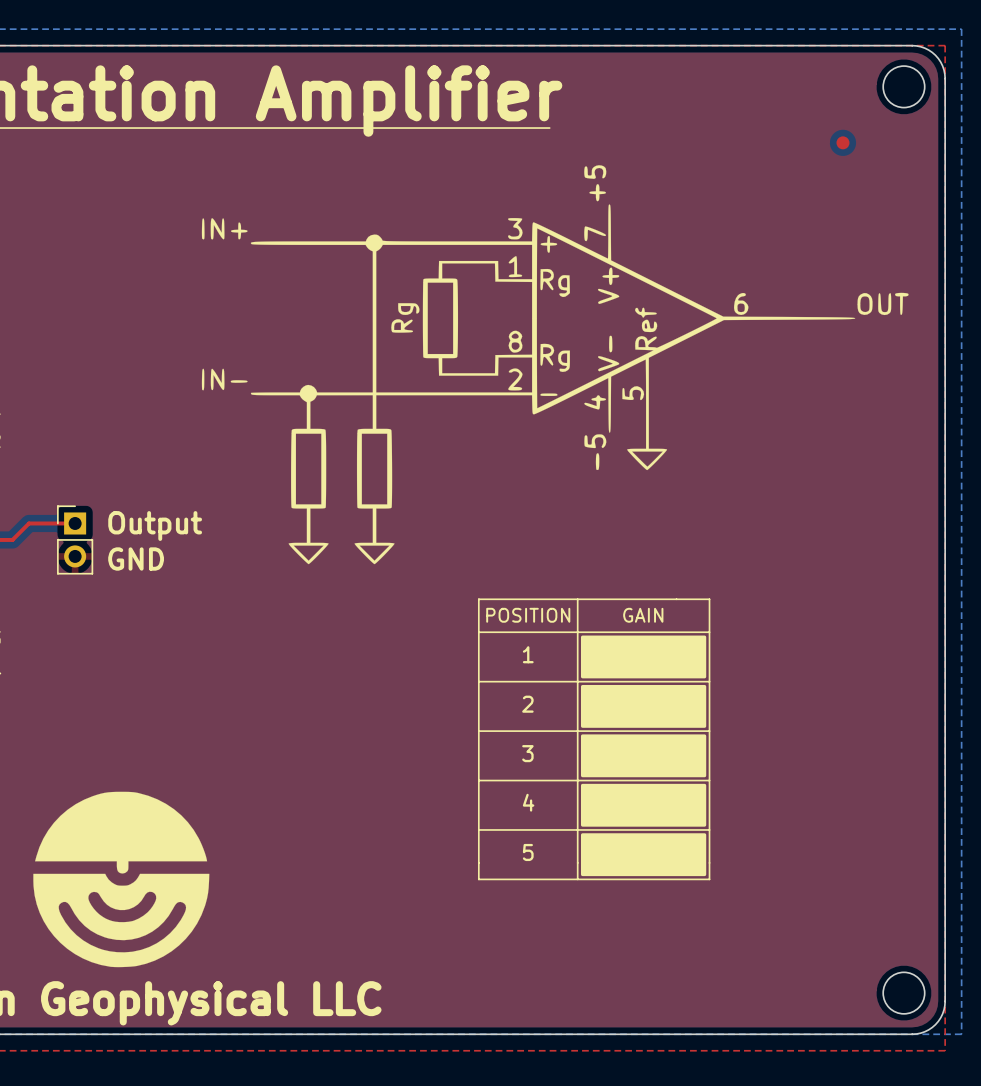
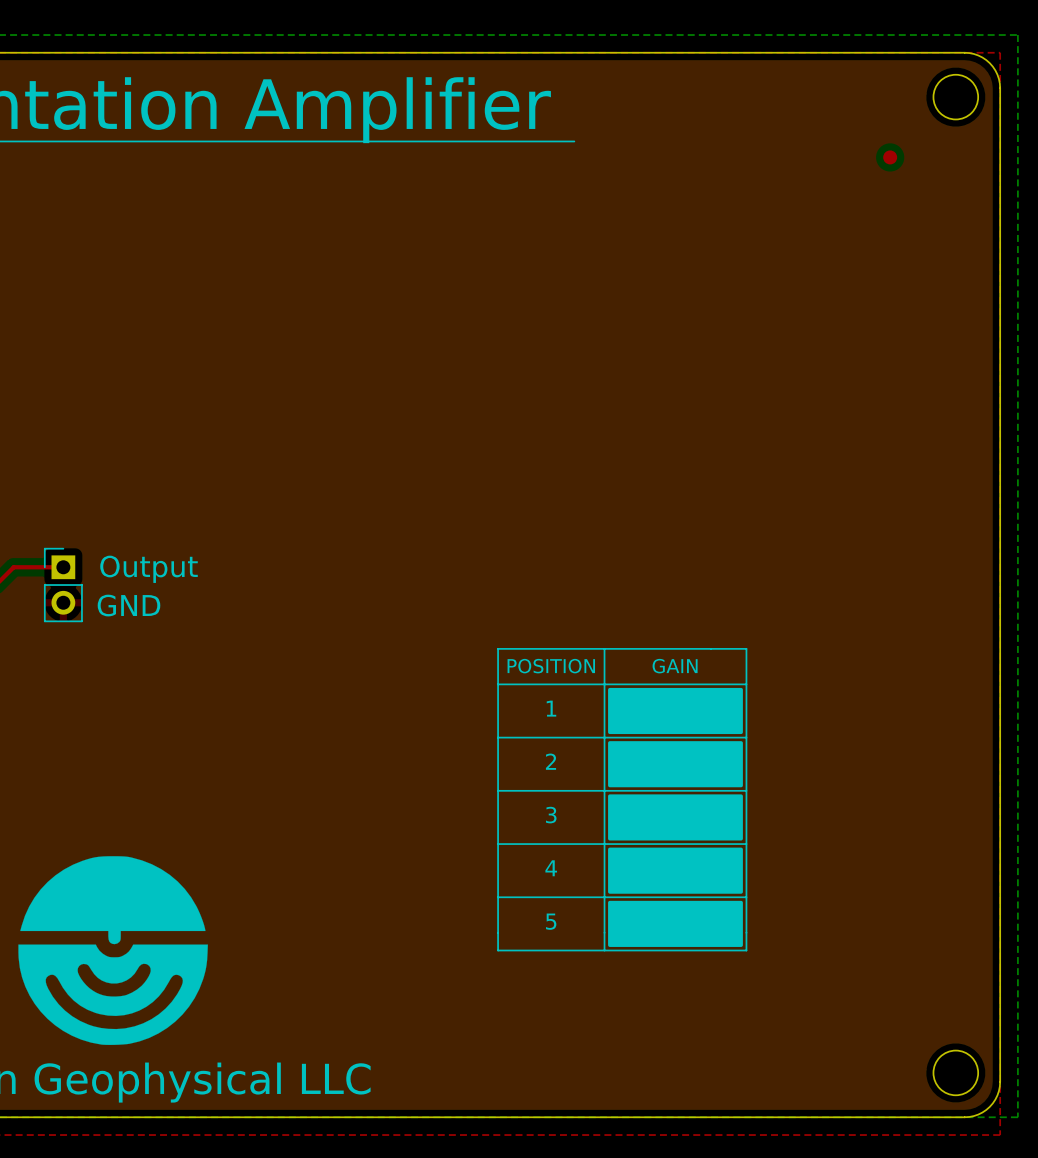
drawing: [201, 165, 909, 565] -> none

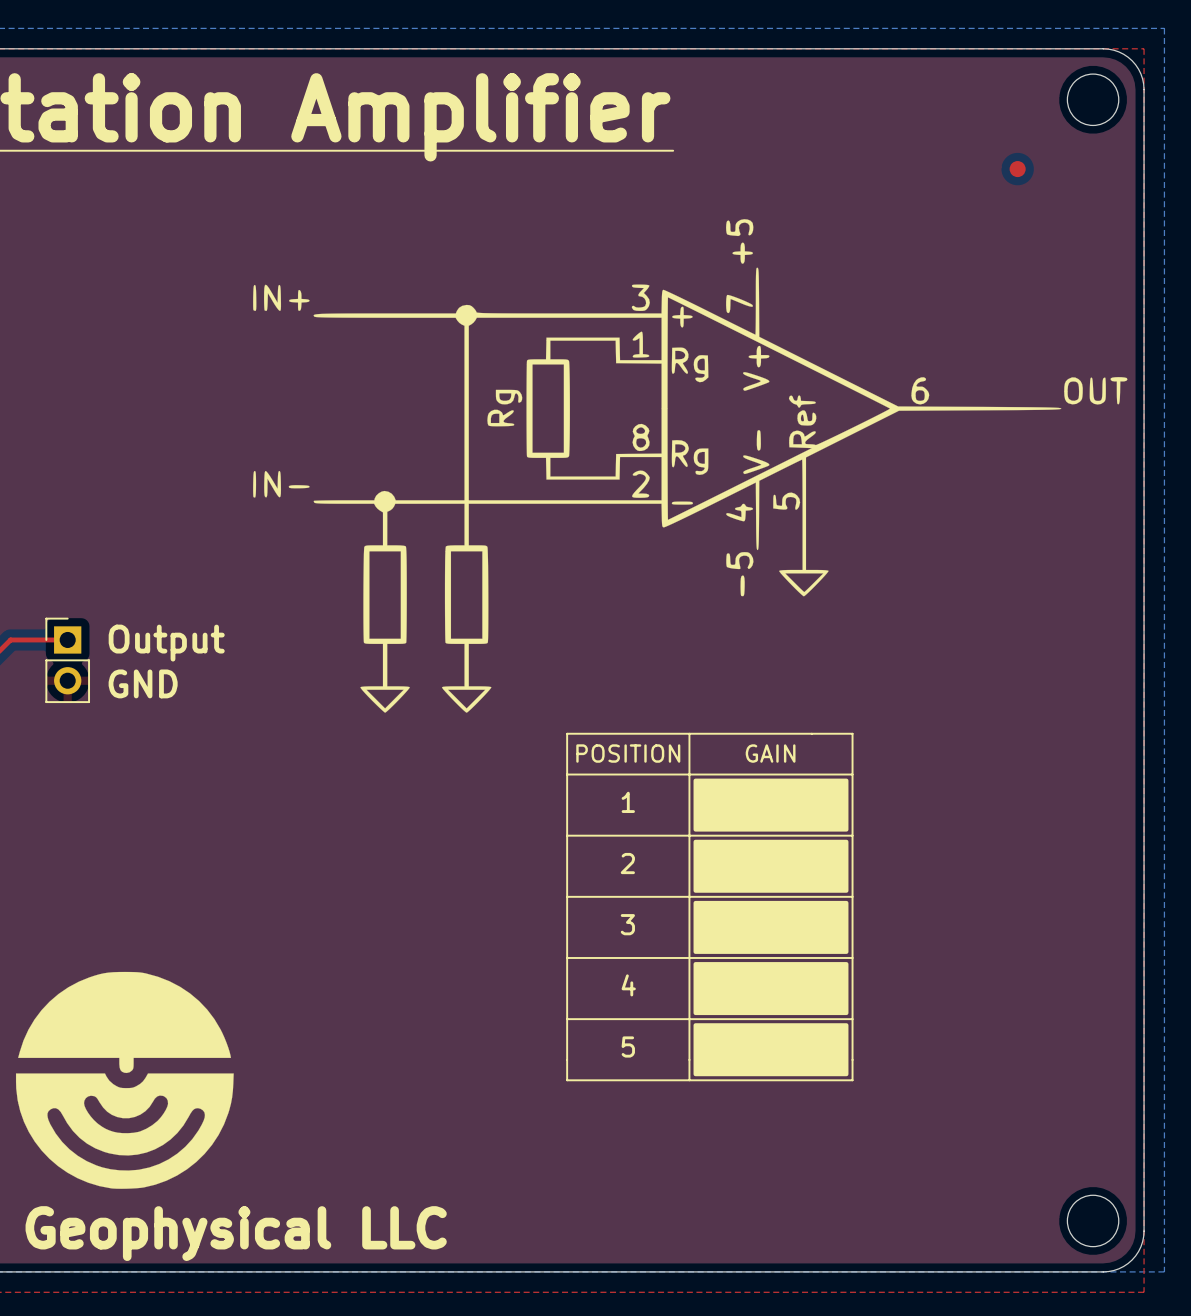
line: none -> (654, 150) (673, 150)
drawing: none -> [253, 219, 1128, 713]

